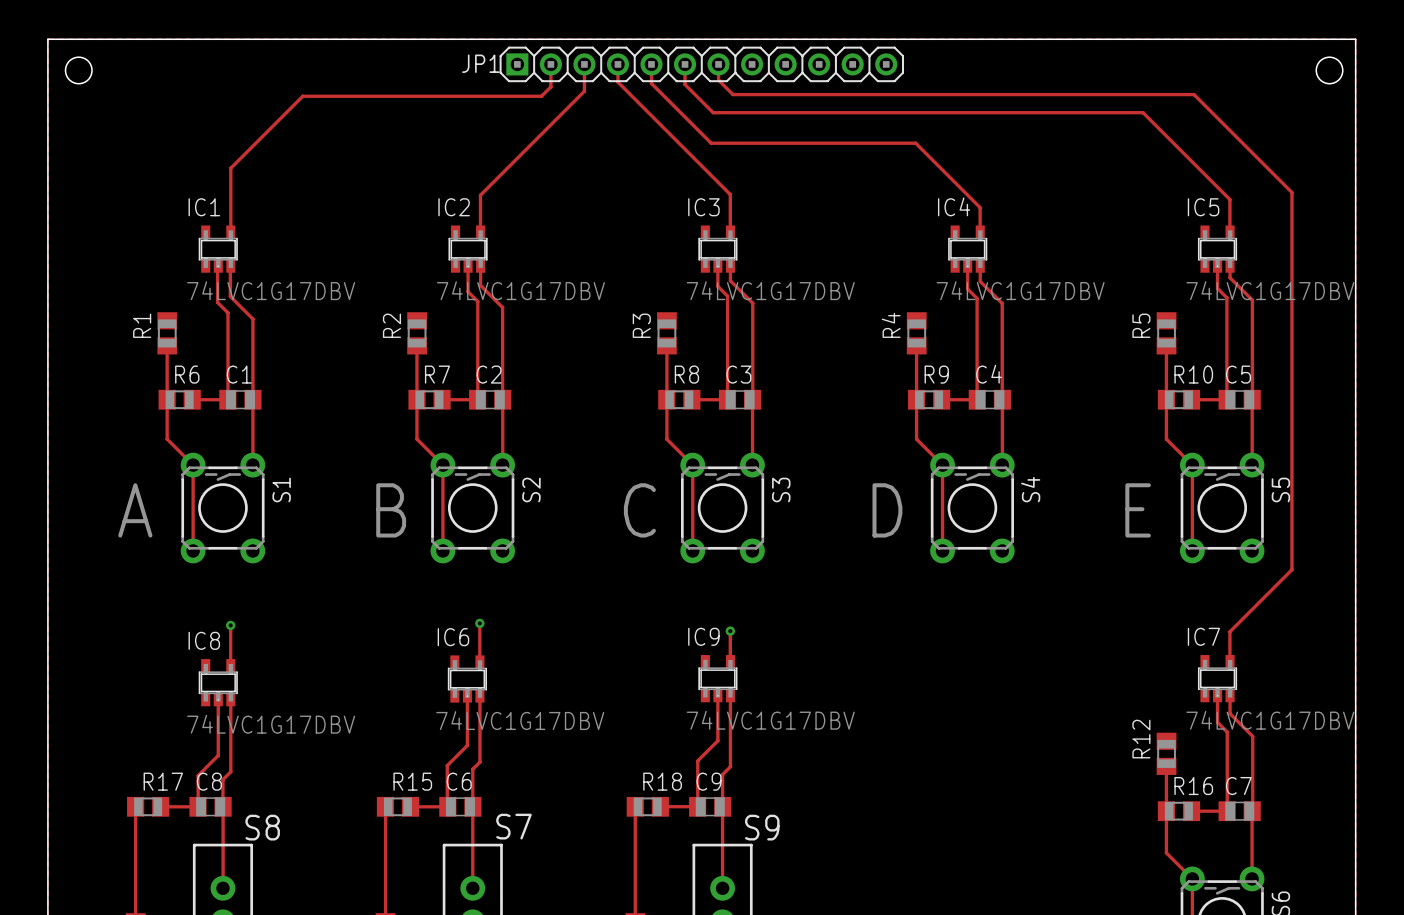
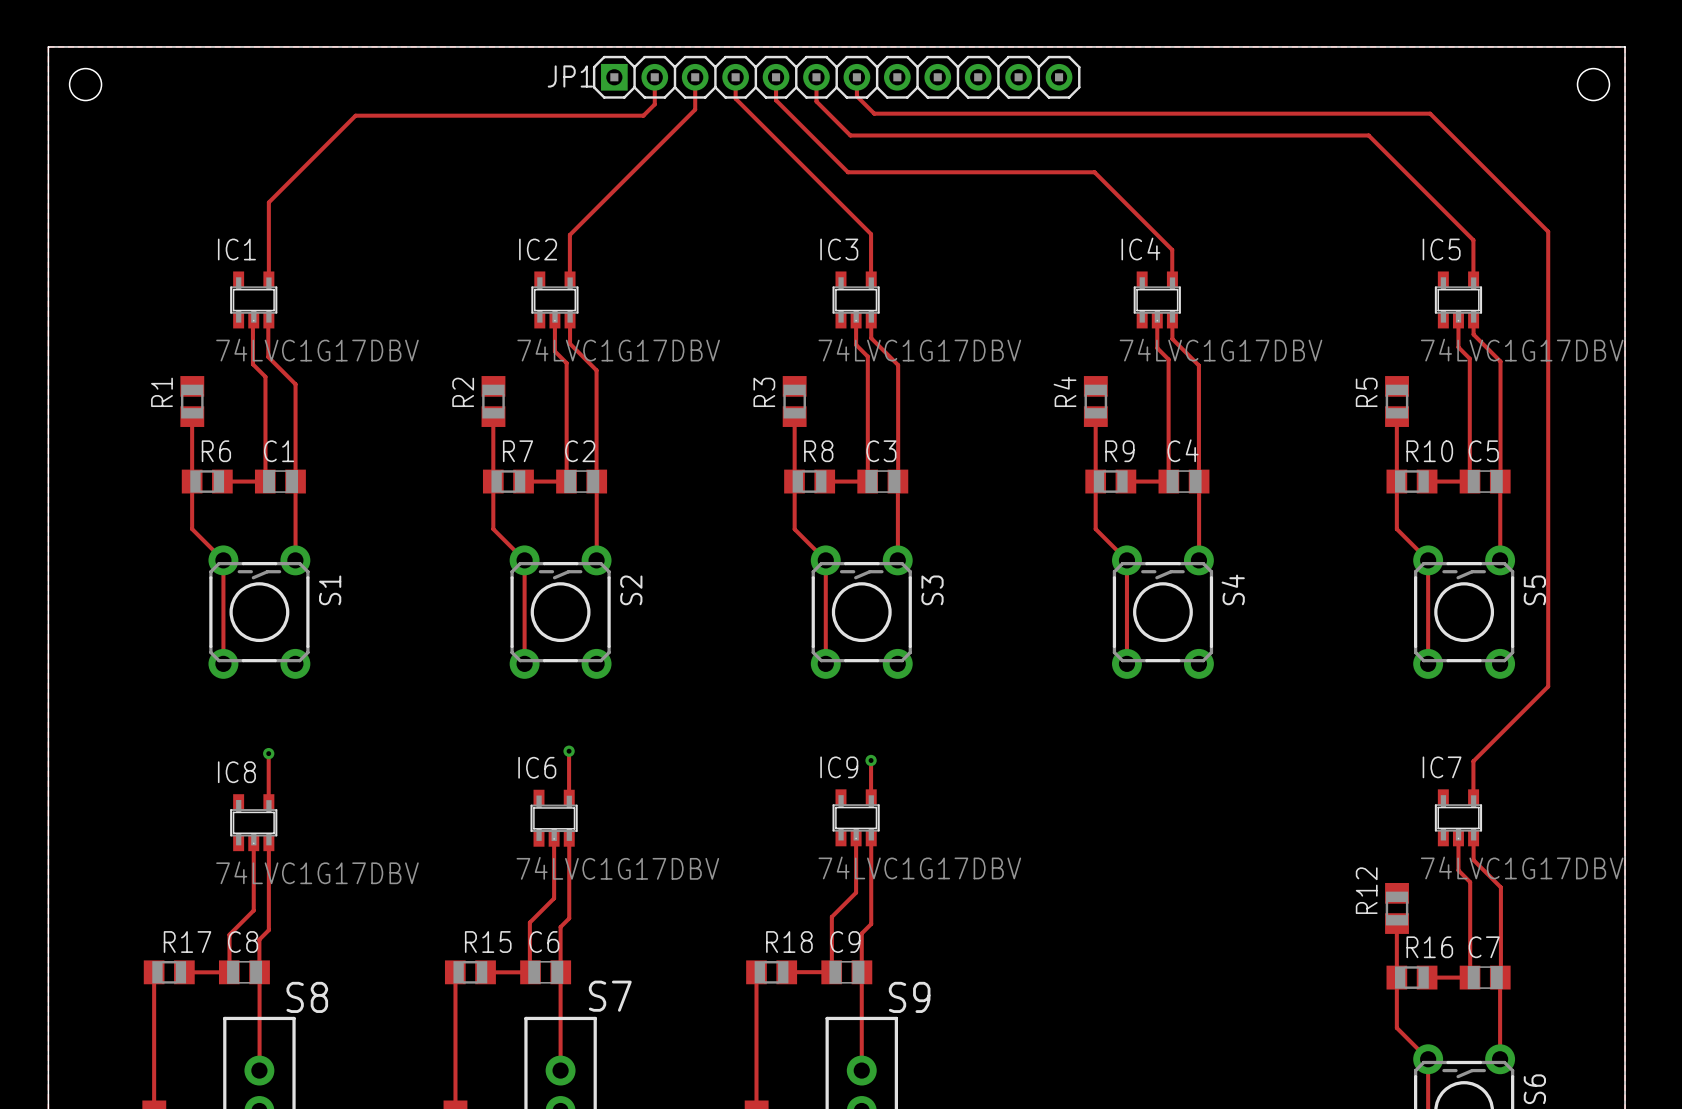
text: A (135, 510) -> none
text: B (391, 510) -> none
text: C (639, 510) -> none
text: D (887, 510) -> none
text: E (1138, 510) -> none

